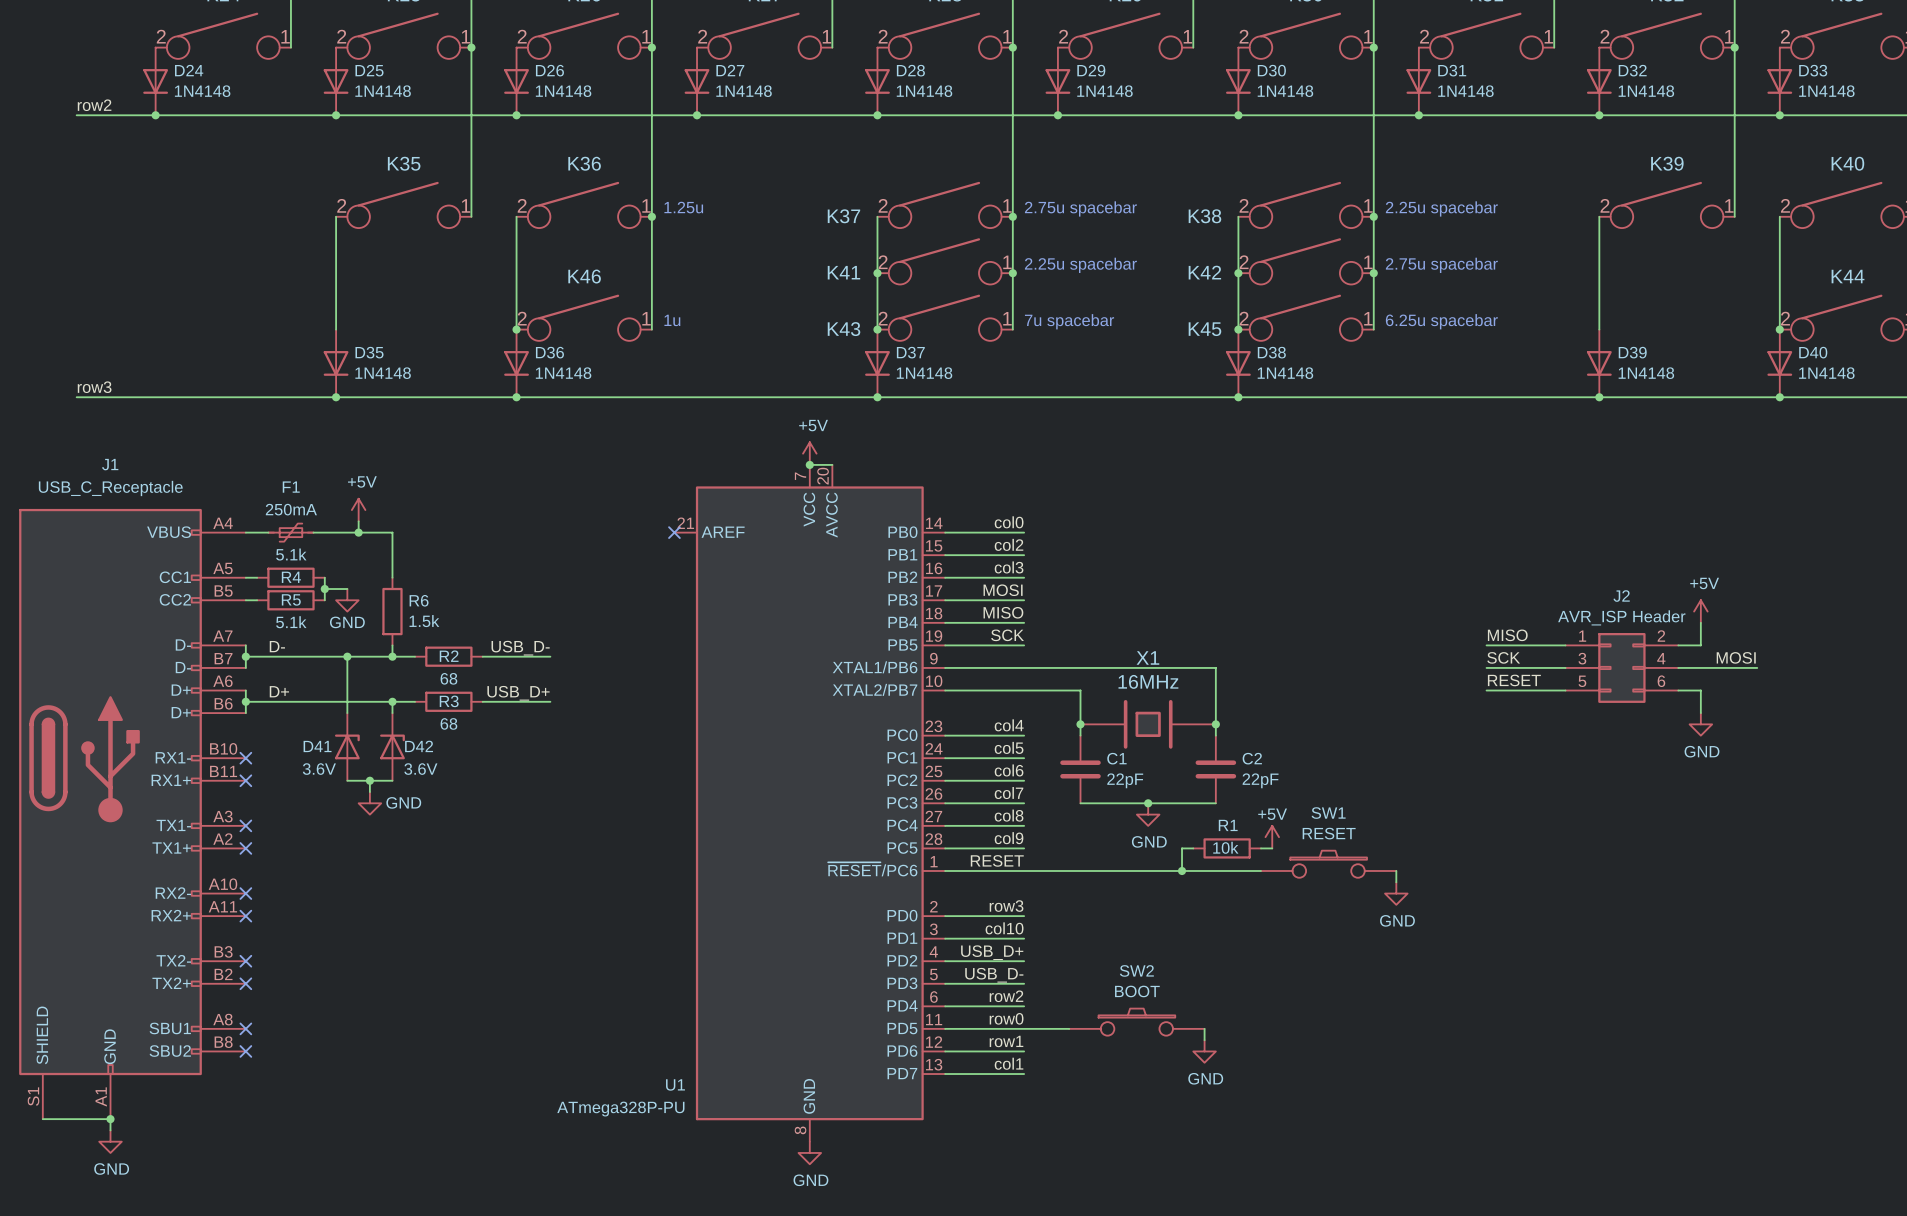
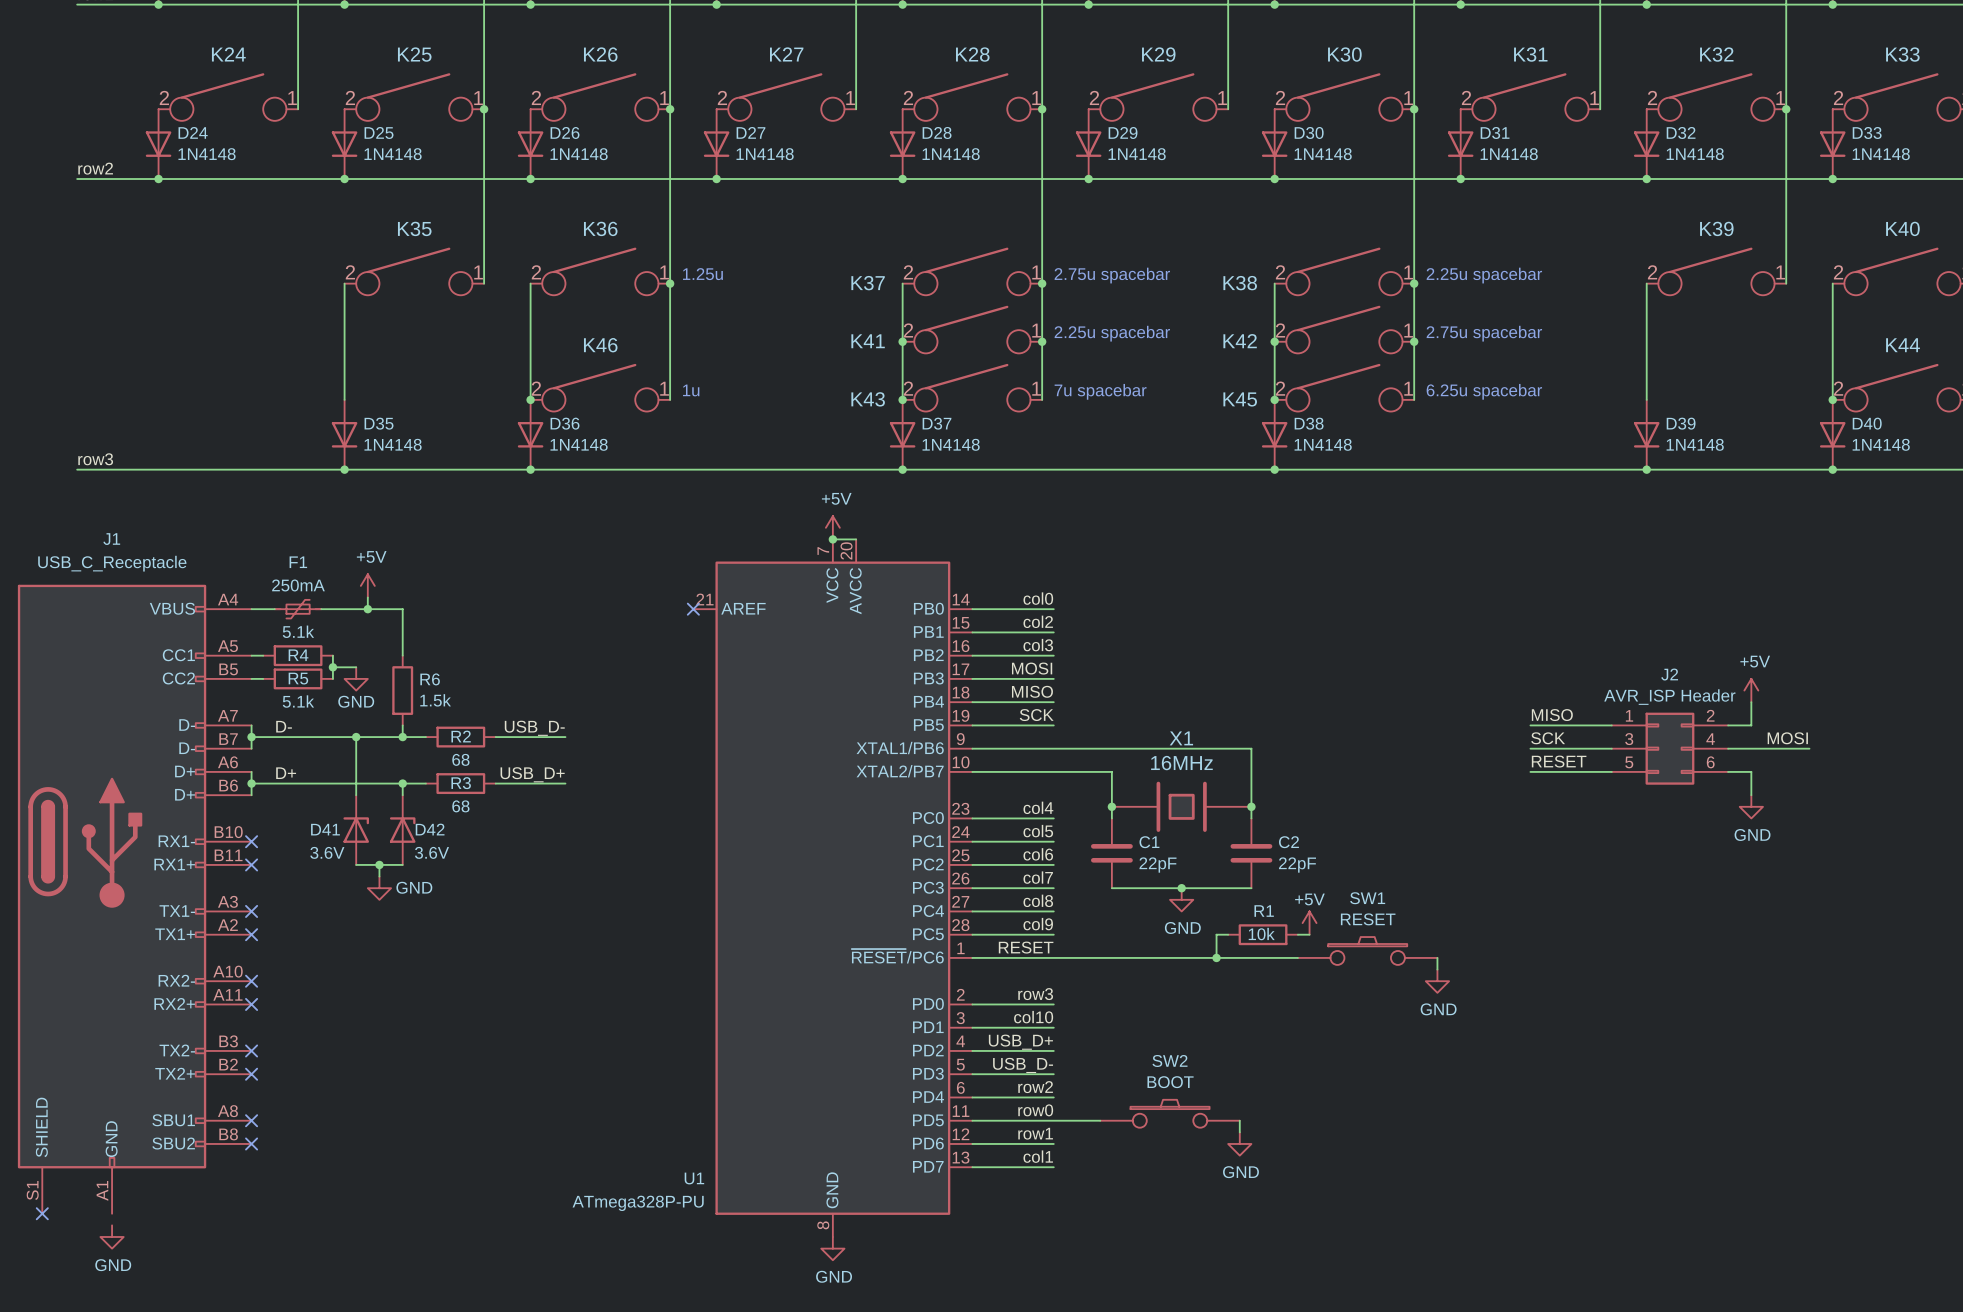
wire: (42, 1119) (110, 1119) (110, 1130) -> none
no-connect mark: none -> (42, 1213)
junction: (110, 1119) -> none

